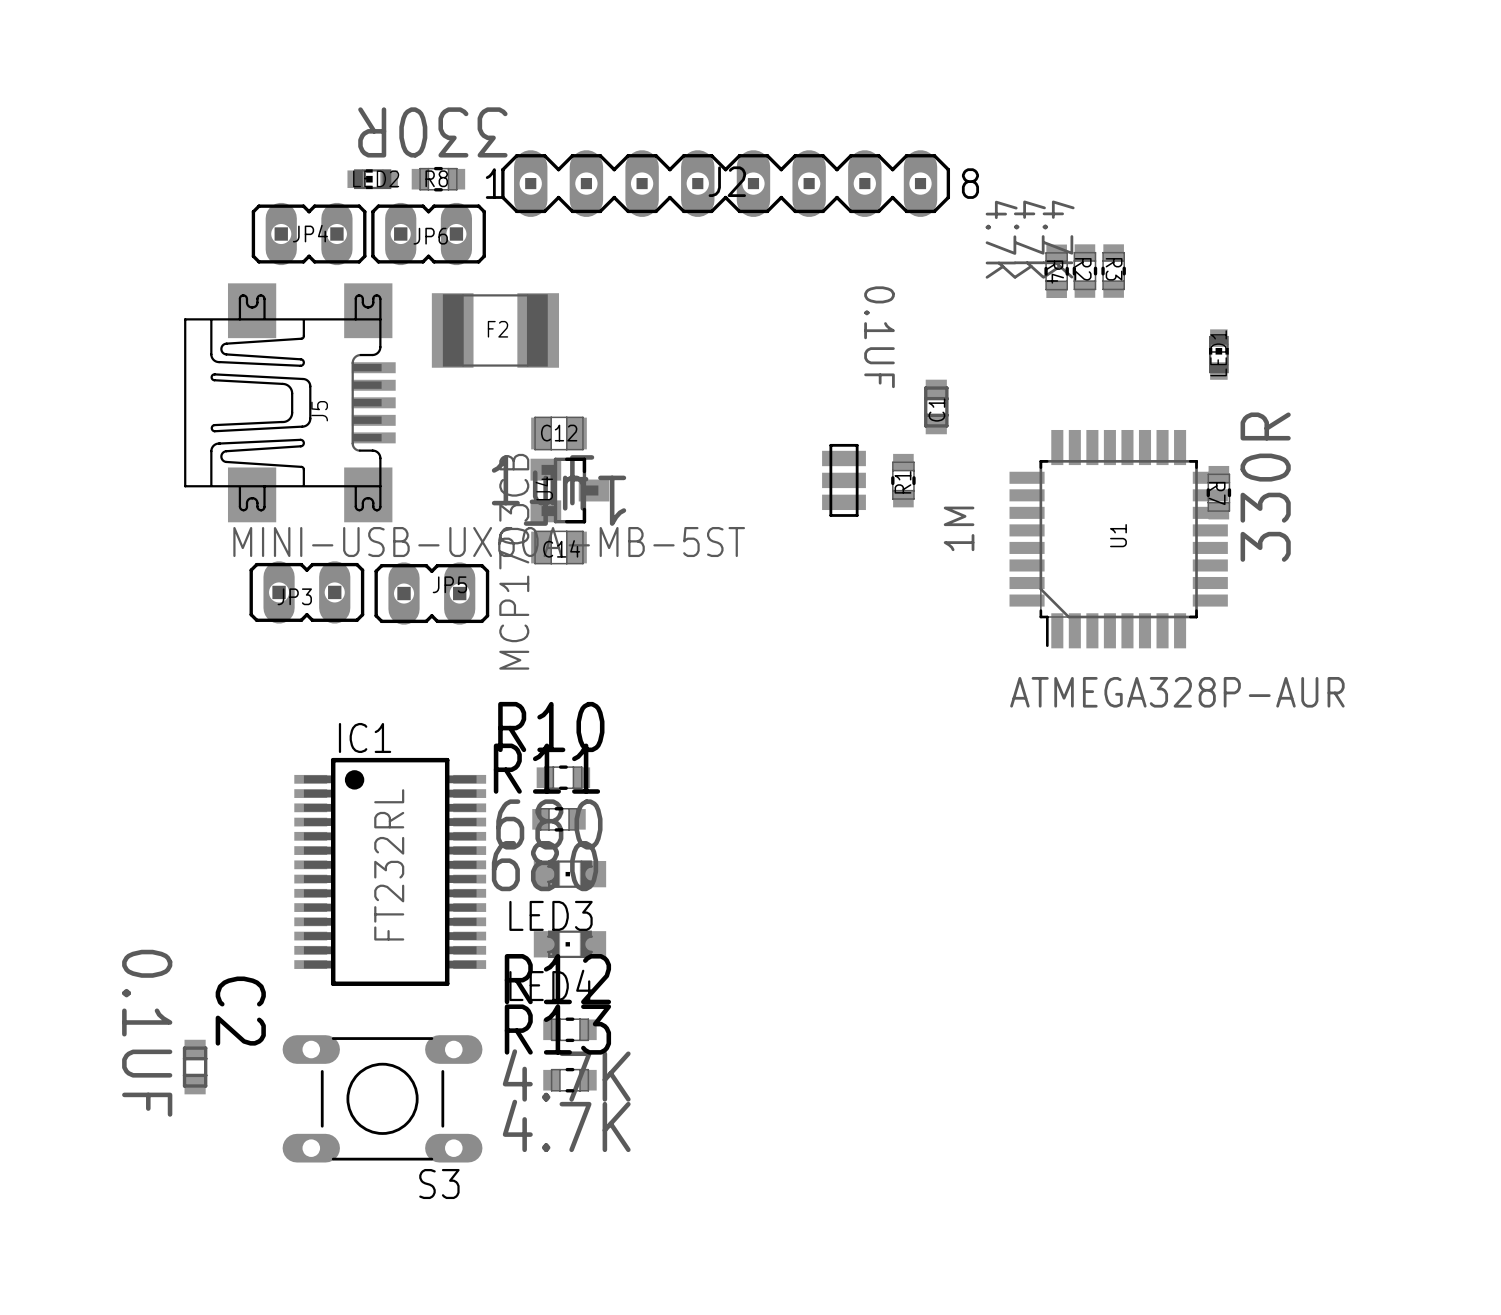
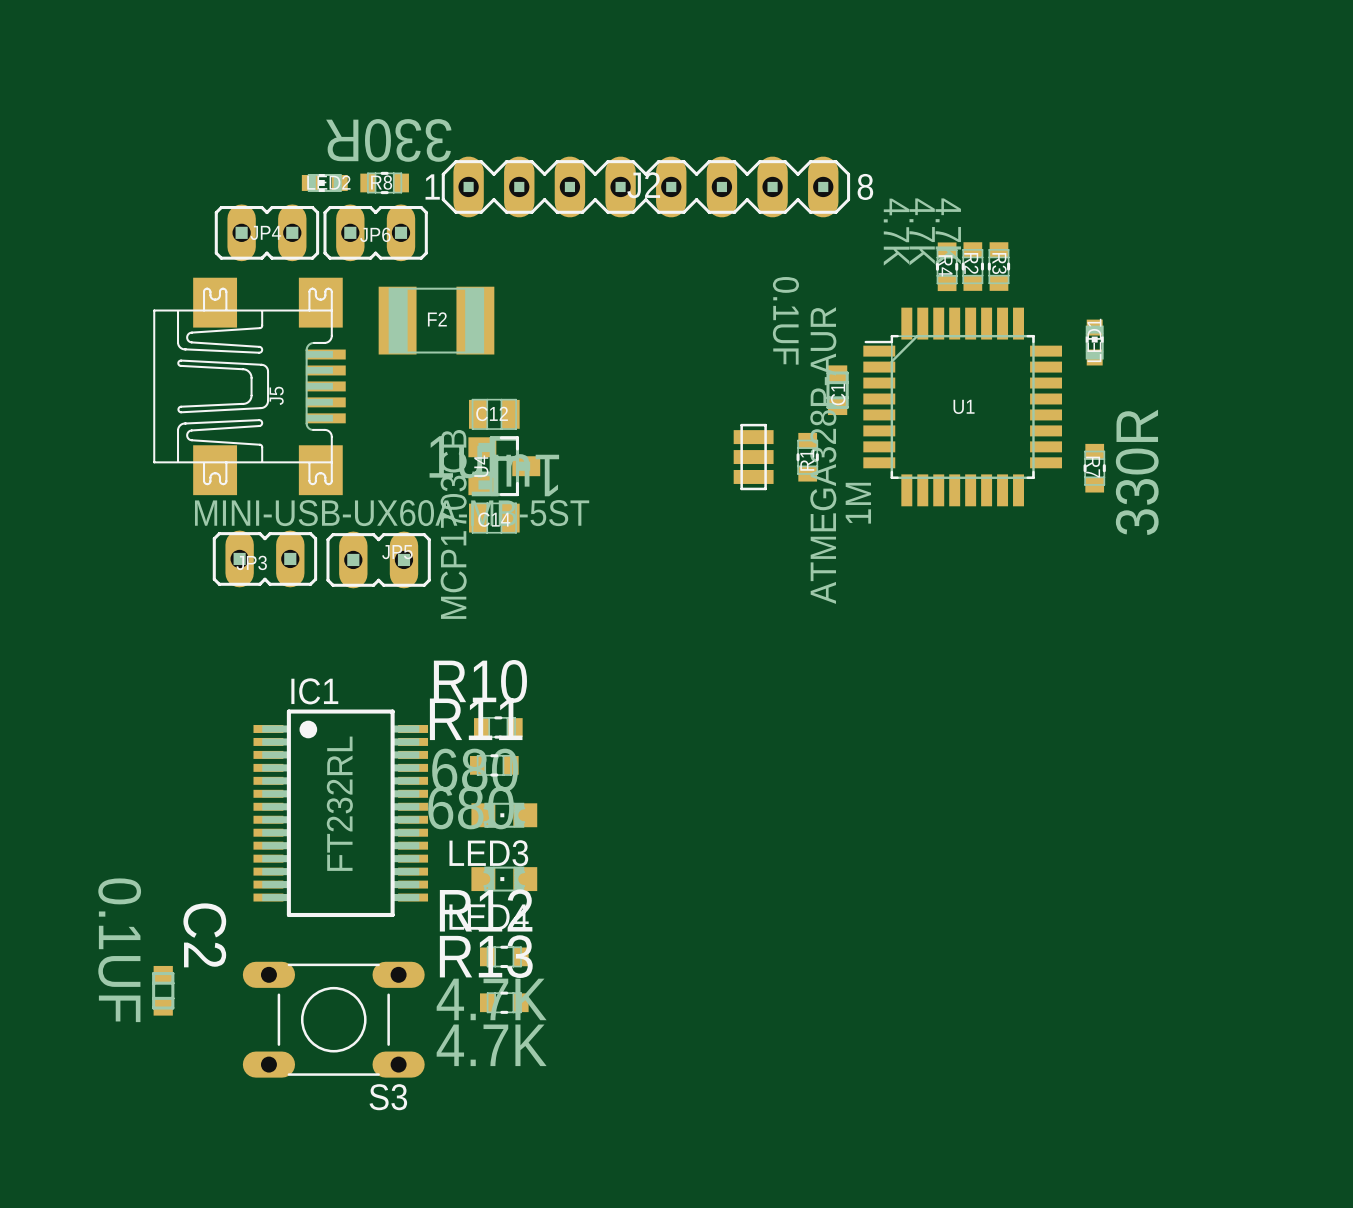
U1 rotation: 0° (1118, 539) -> 90° clockwise (962, 406)

